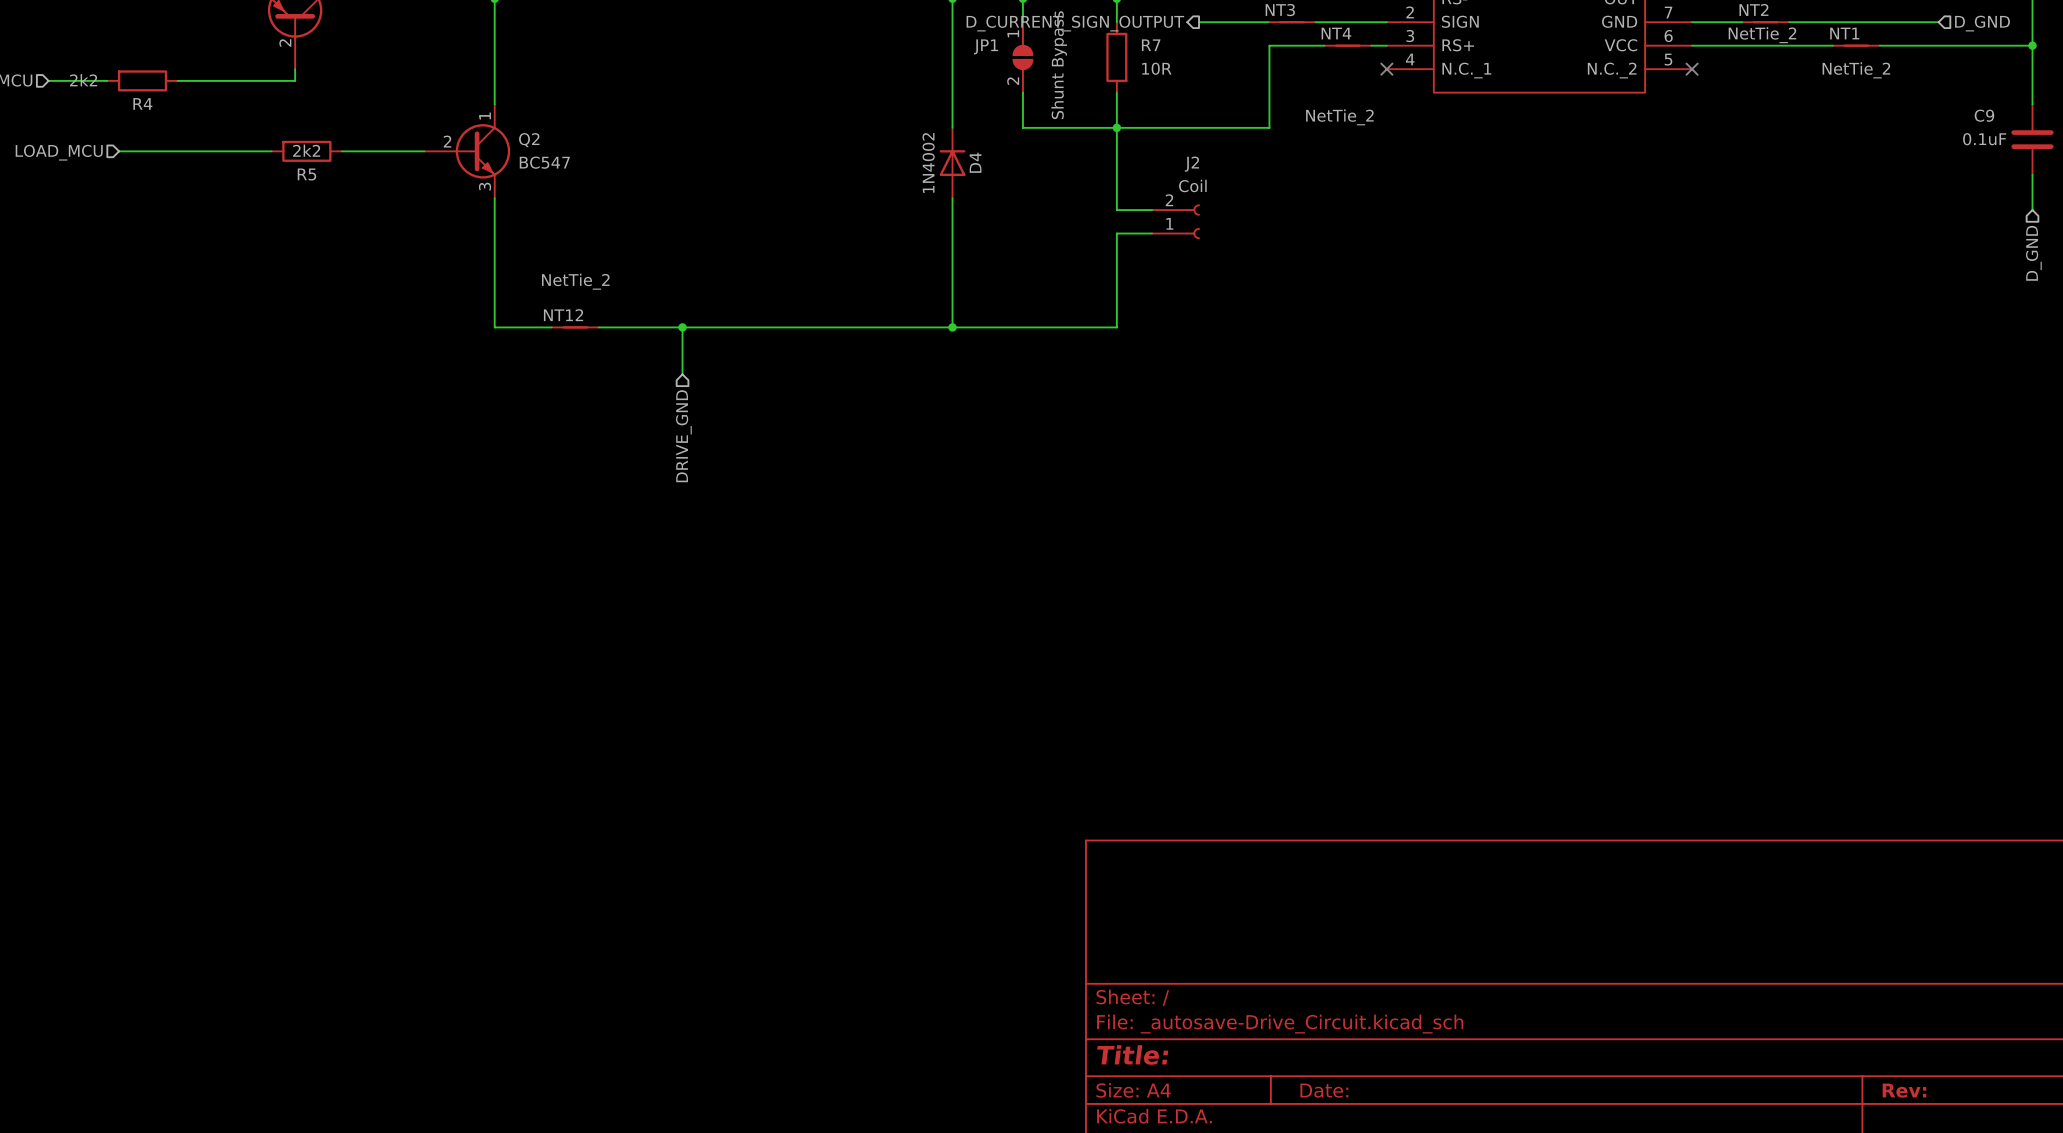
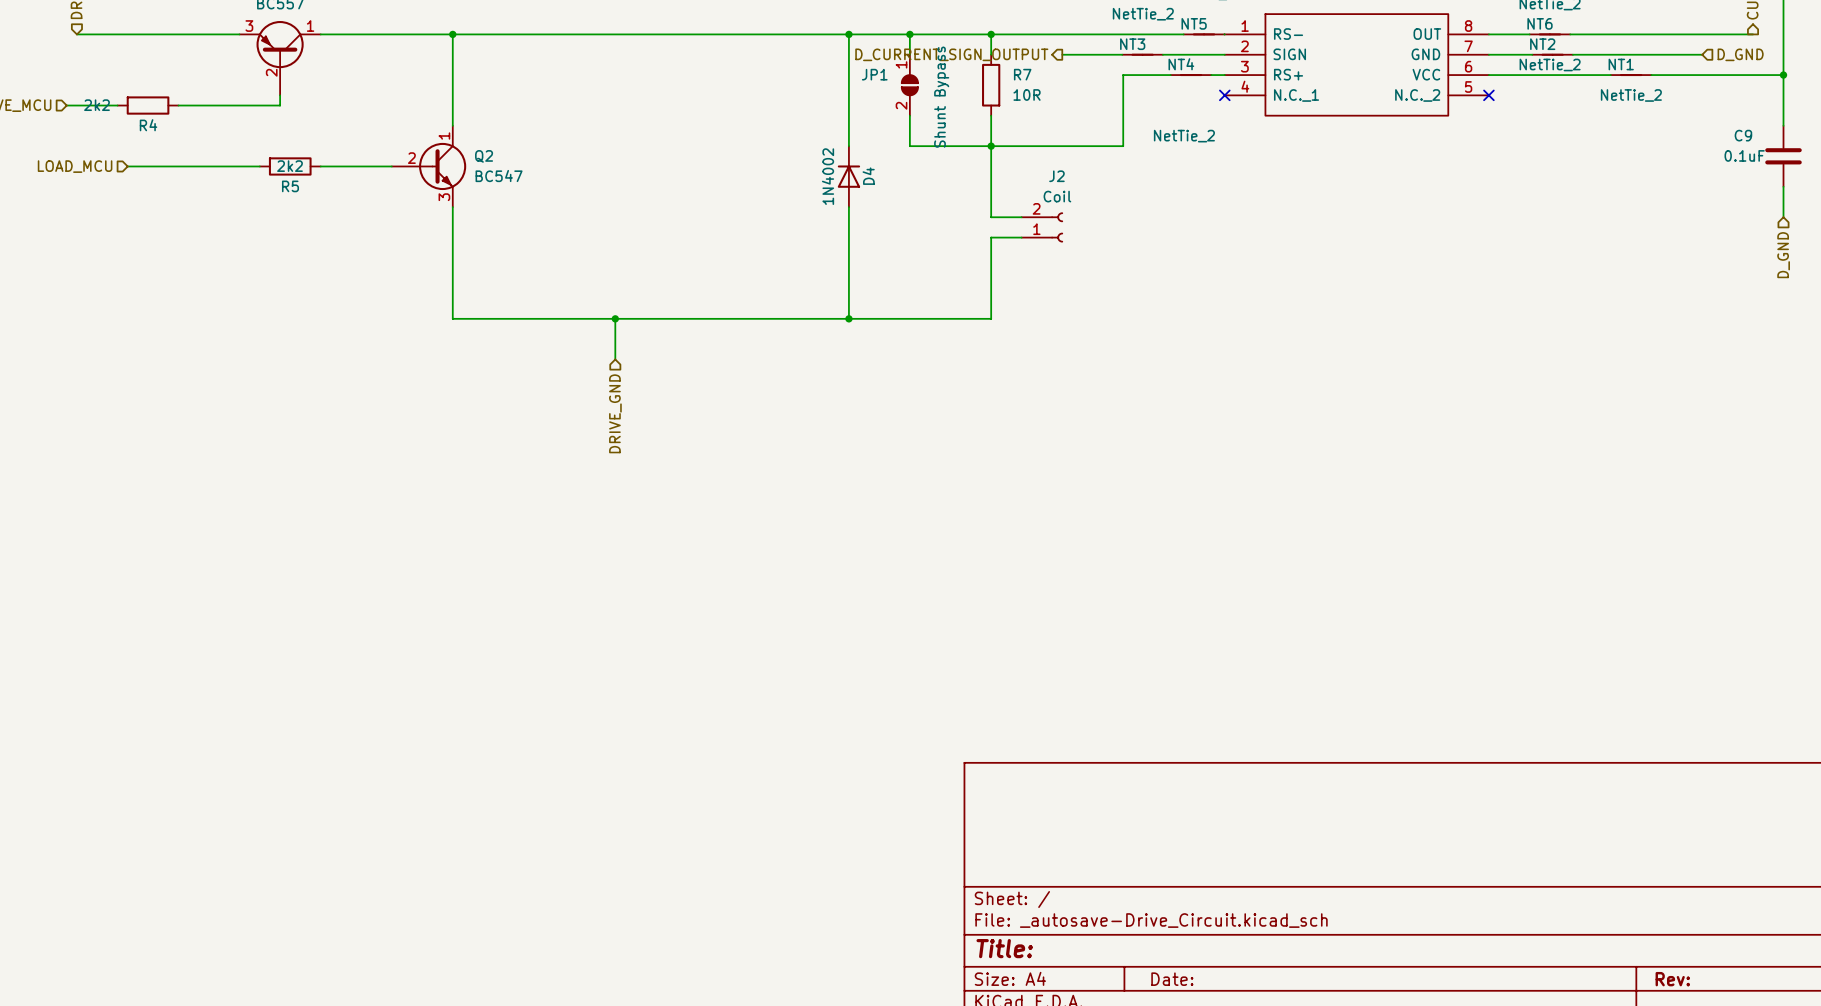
NT12: NetTie_2 (575, 327) -> none

